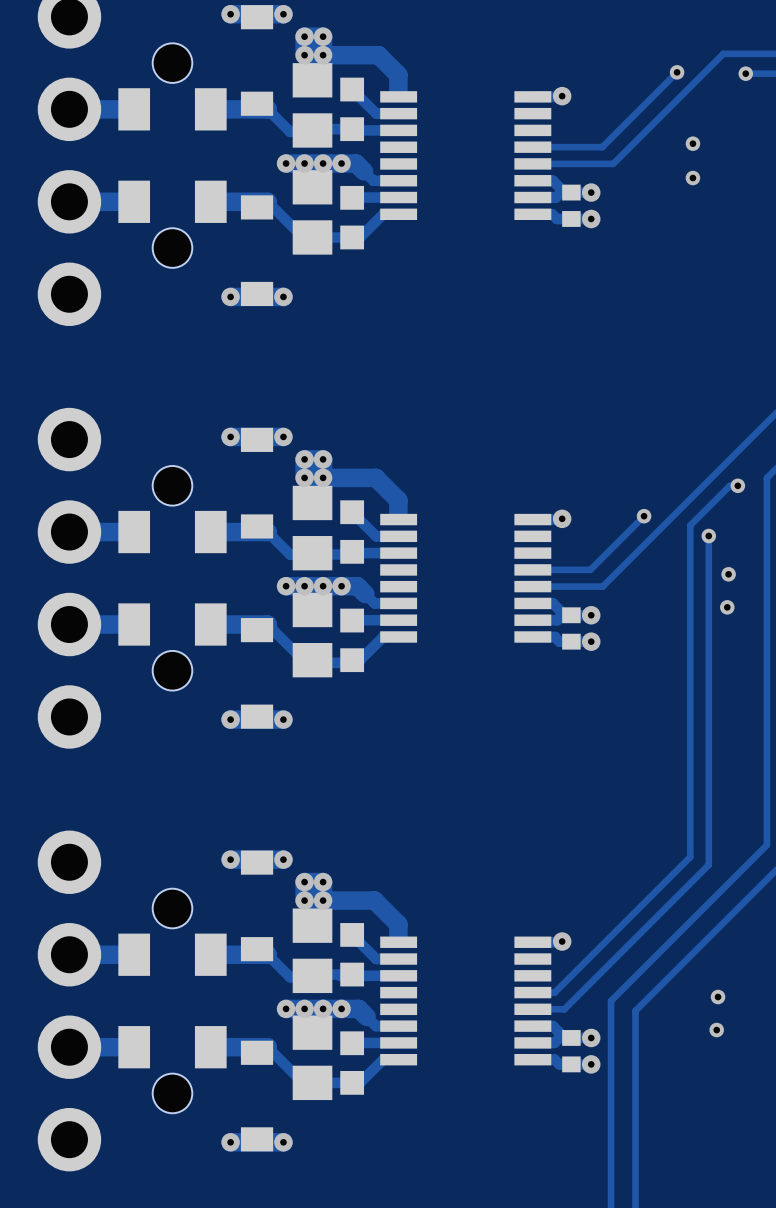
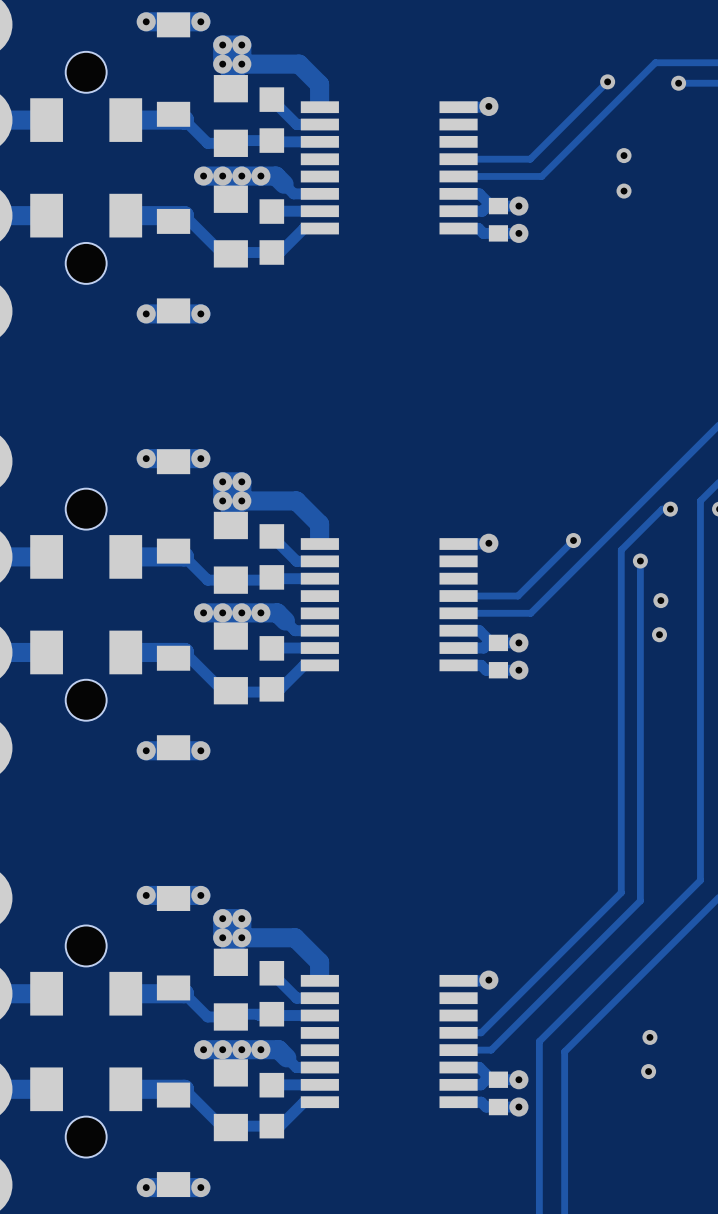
part footprint: [292, 63, 333, 148] -> [213, 75, 248, 157]
part footprint: [292, 170, 333, 255] -> [213, 185, 248, 268]
part footprint: [292, 485, 333, 571] -> [213, 511, 248, 594]
part footprint: [292, 592, 333, 678] -> [213, 622, 248, 705]
part footprint: [292, 908, 333, 994] -> [213, 948, 248, 1031]
part footprint: [292, 1015, 333, 1101] -> [213, 1059, 248, 1142]

